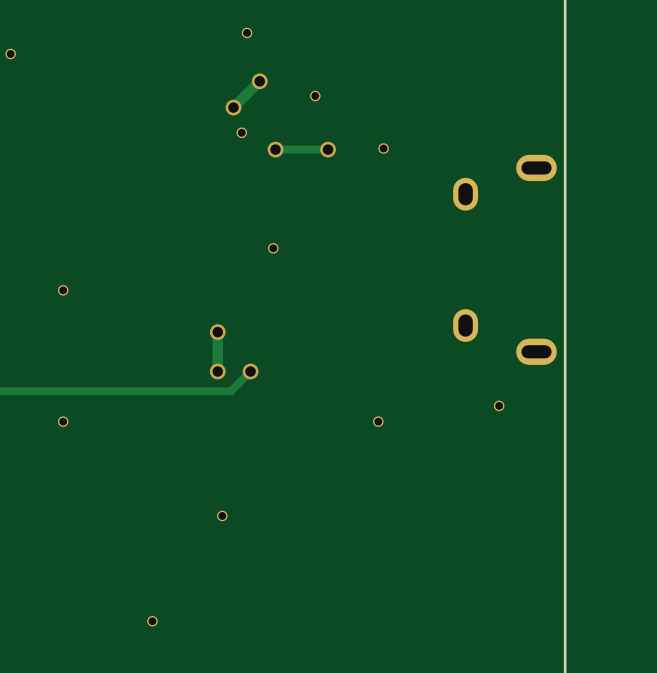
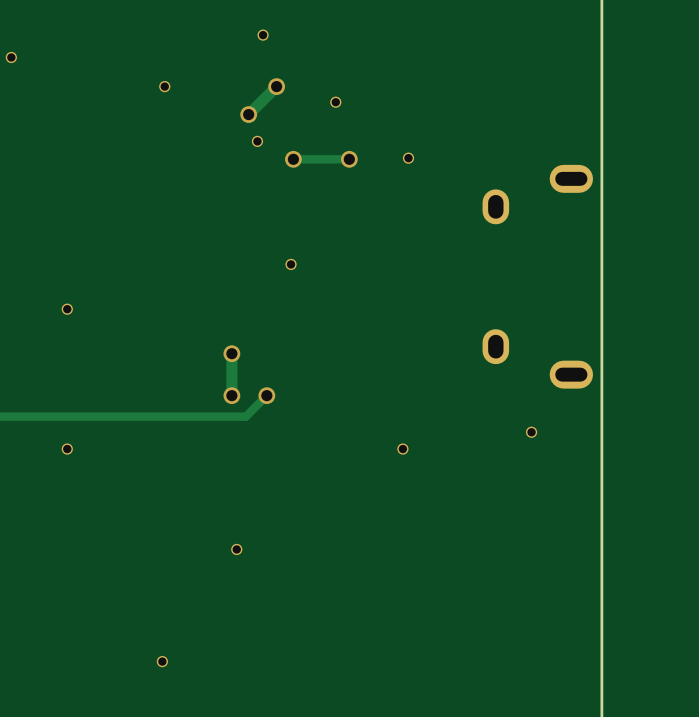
part: none -> (164, 86)

